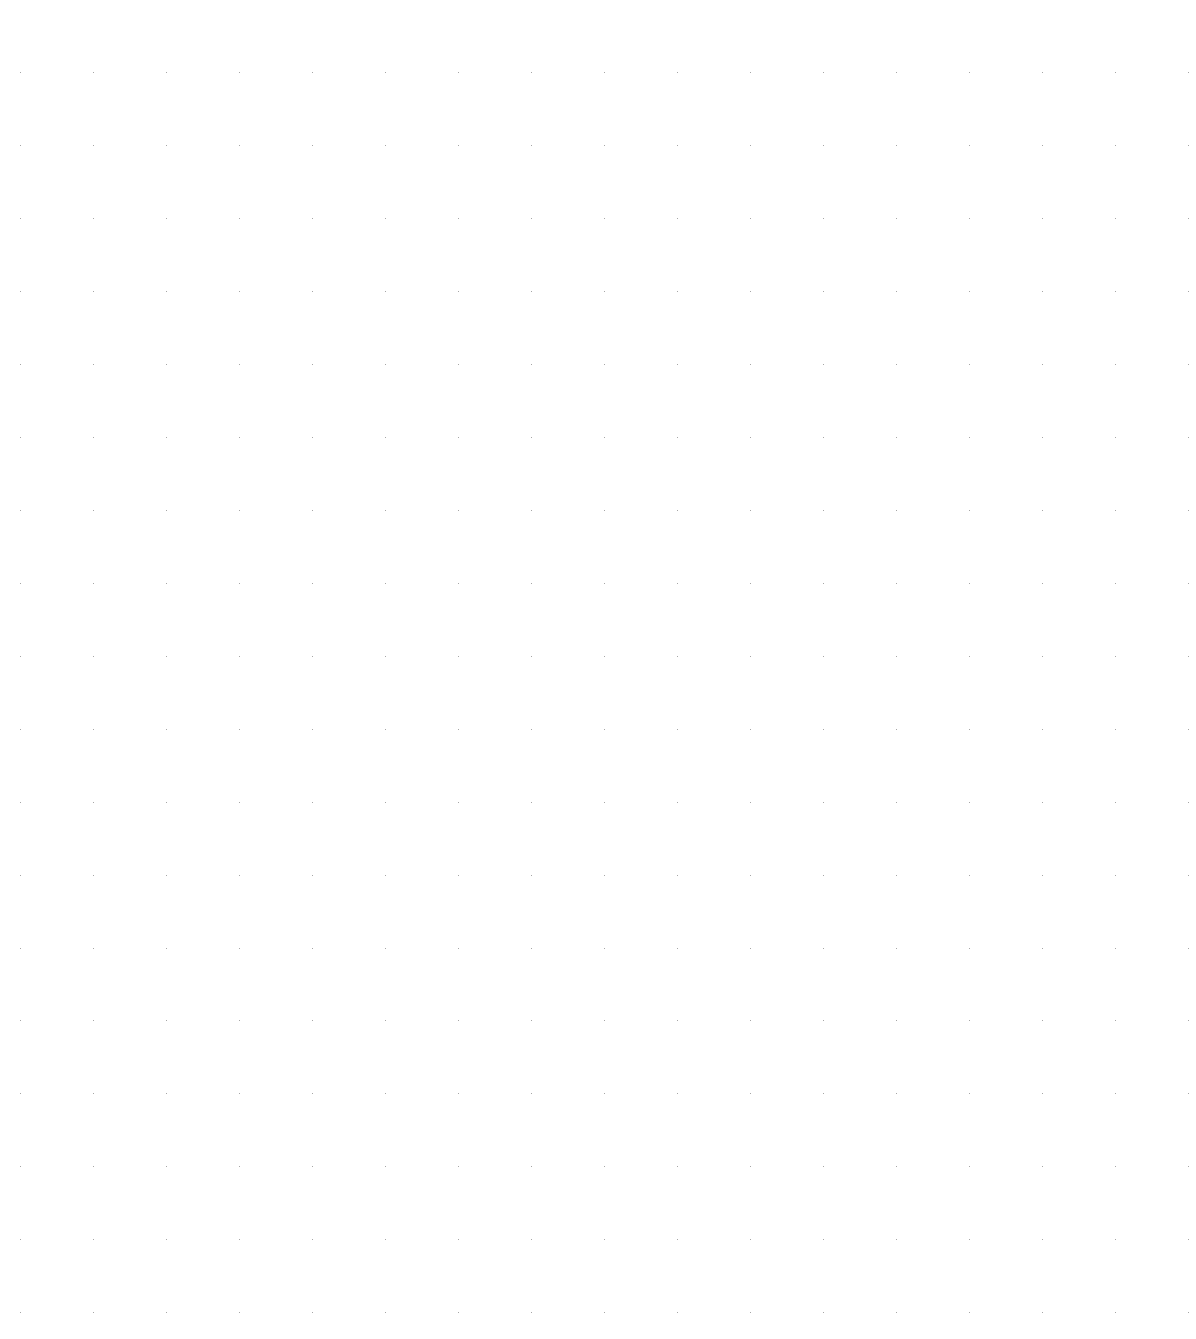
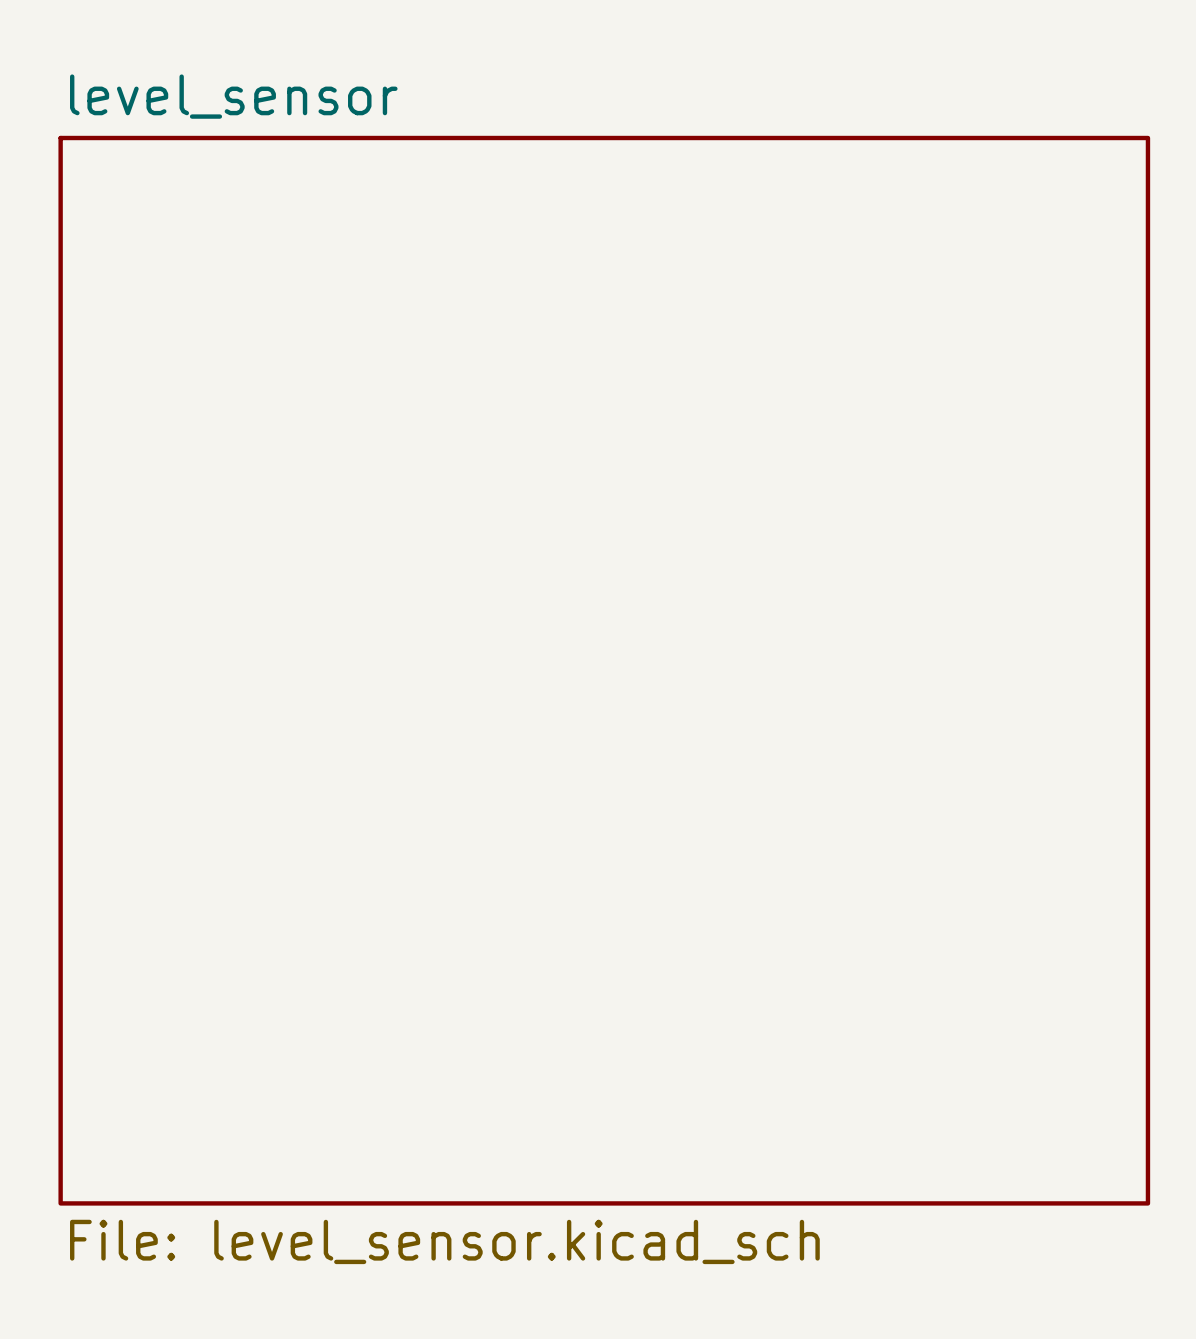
sheet level_sensor: none -> File: level_sensor.kicad_sch (604, 670)

